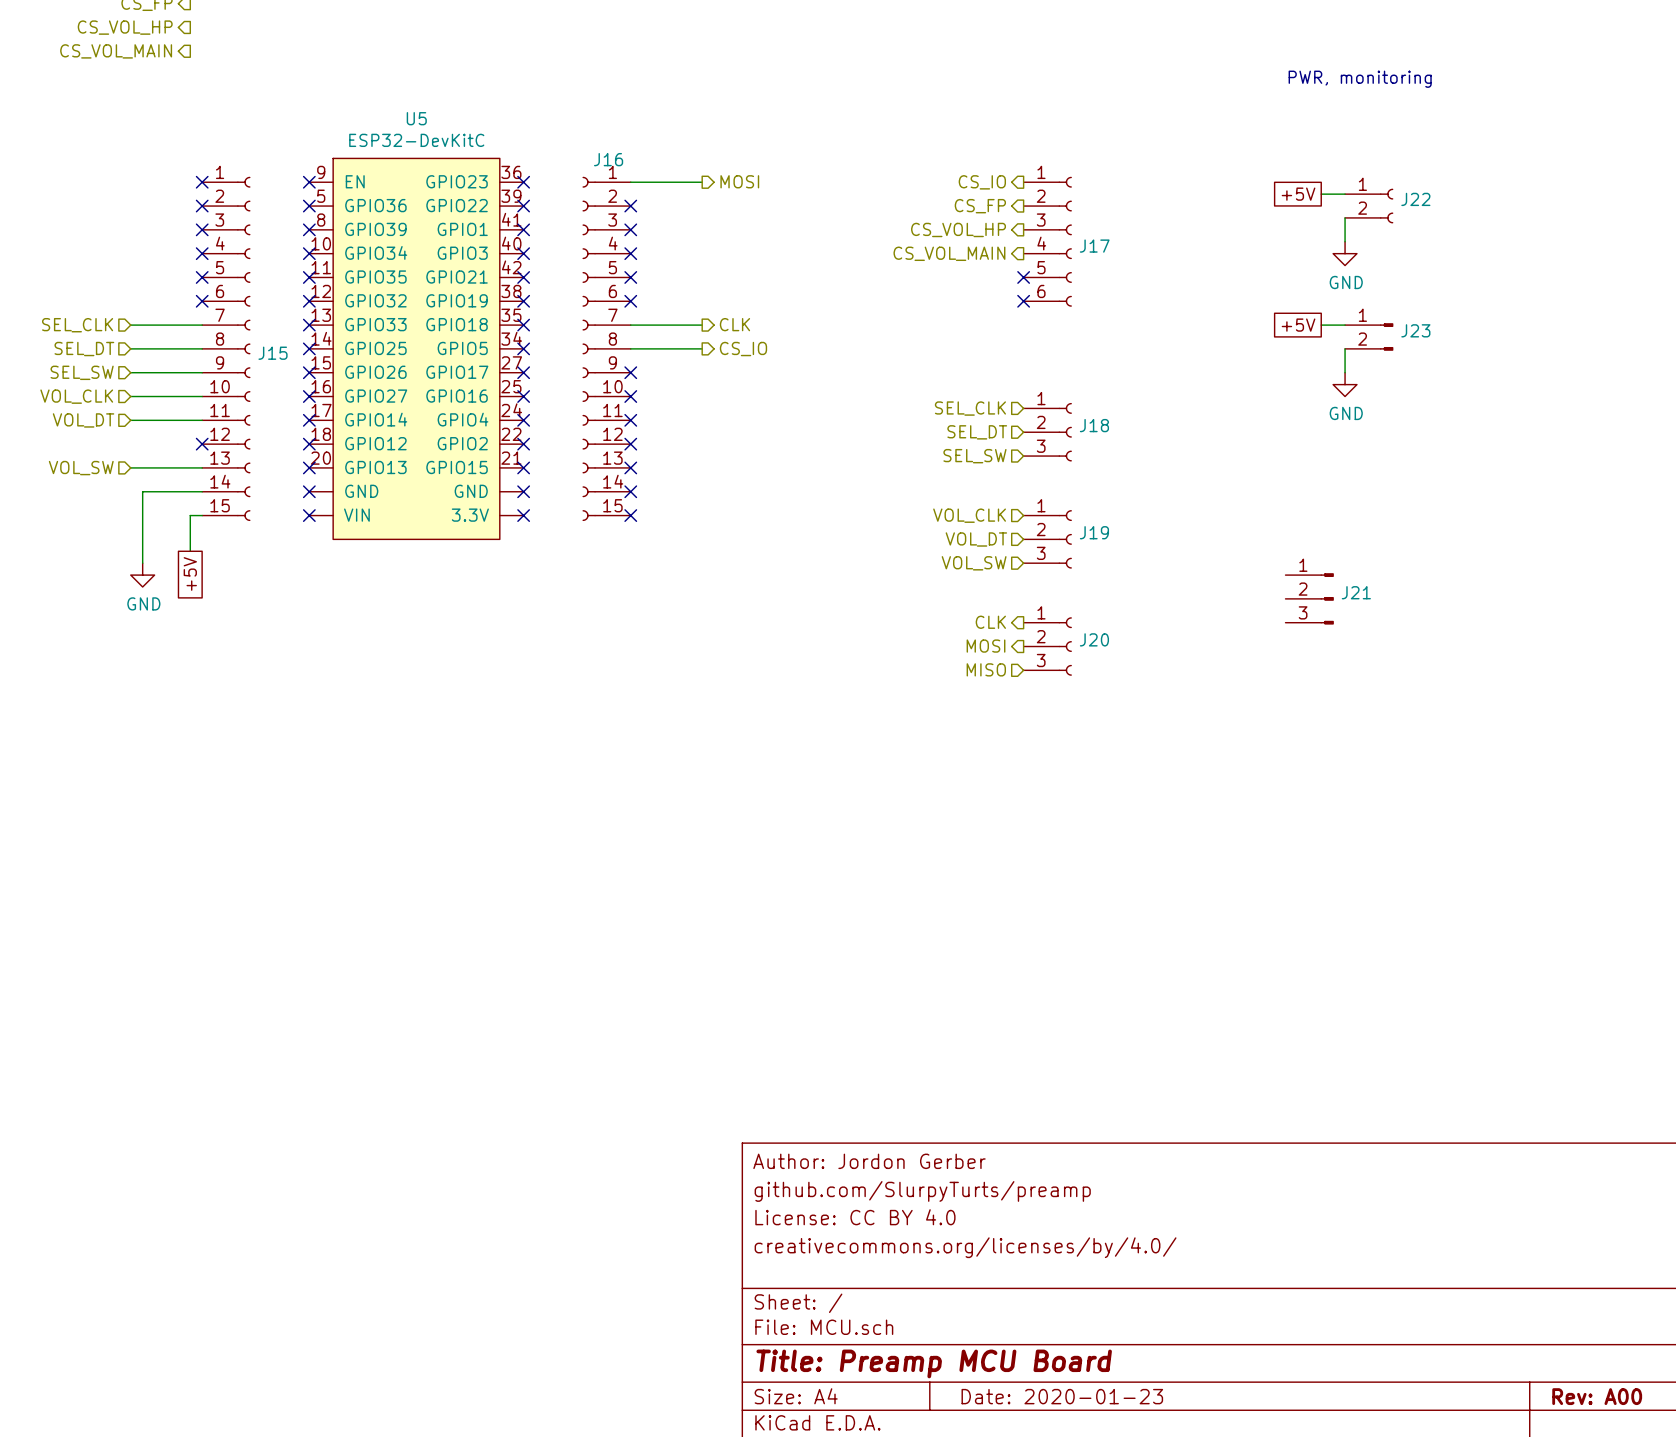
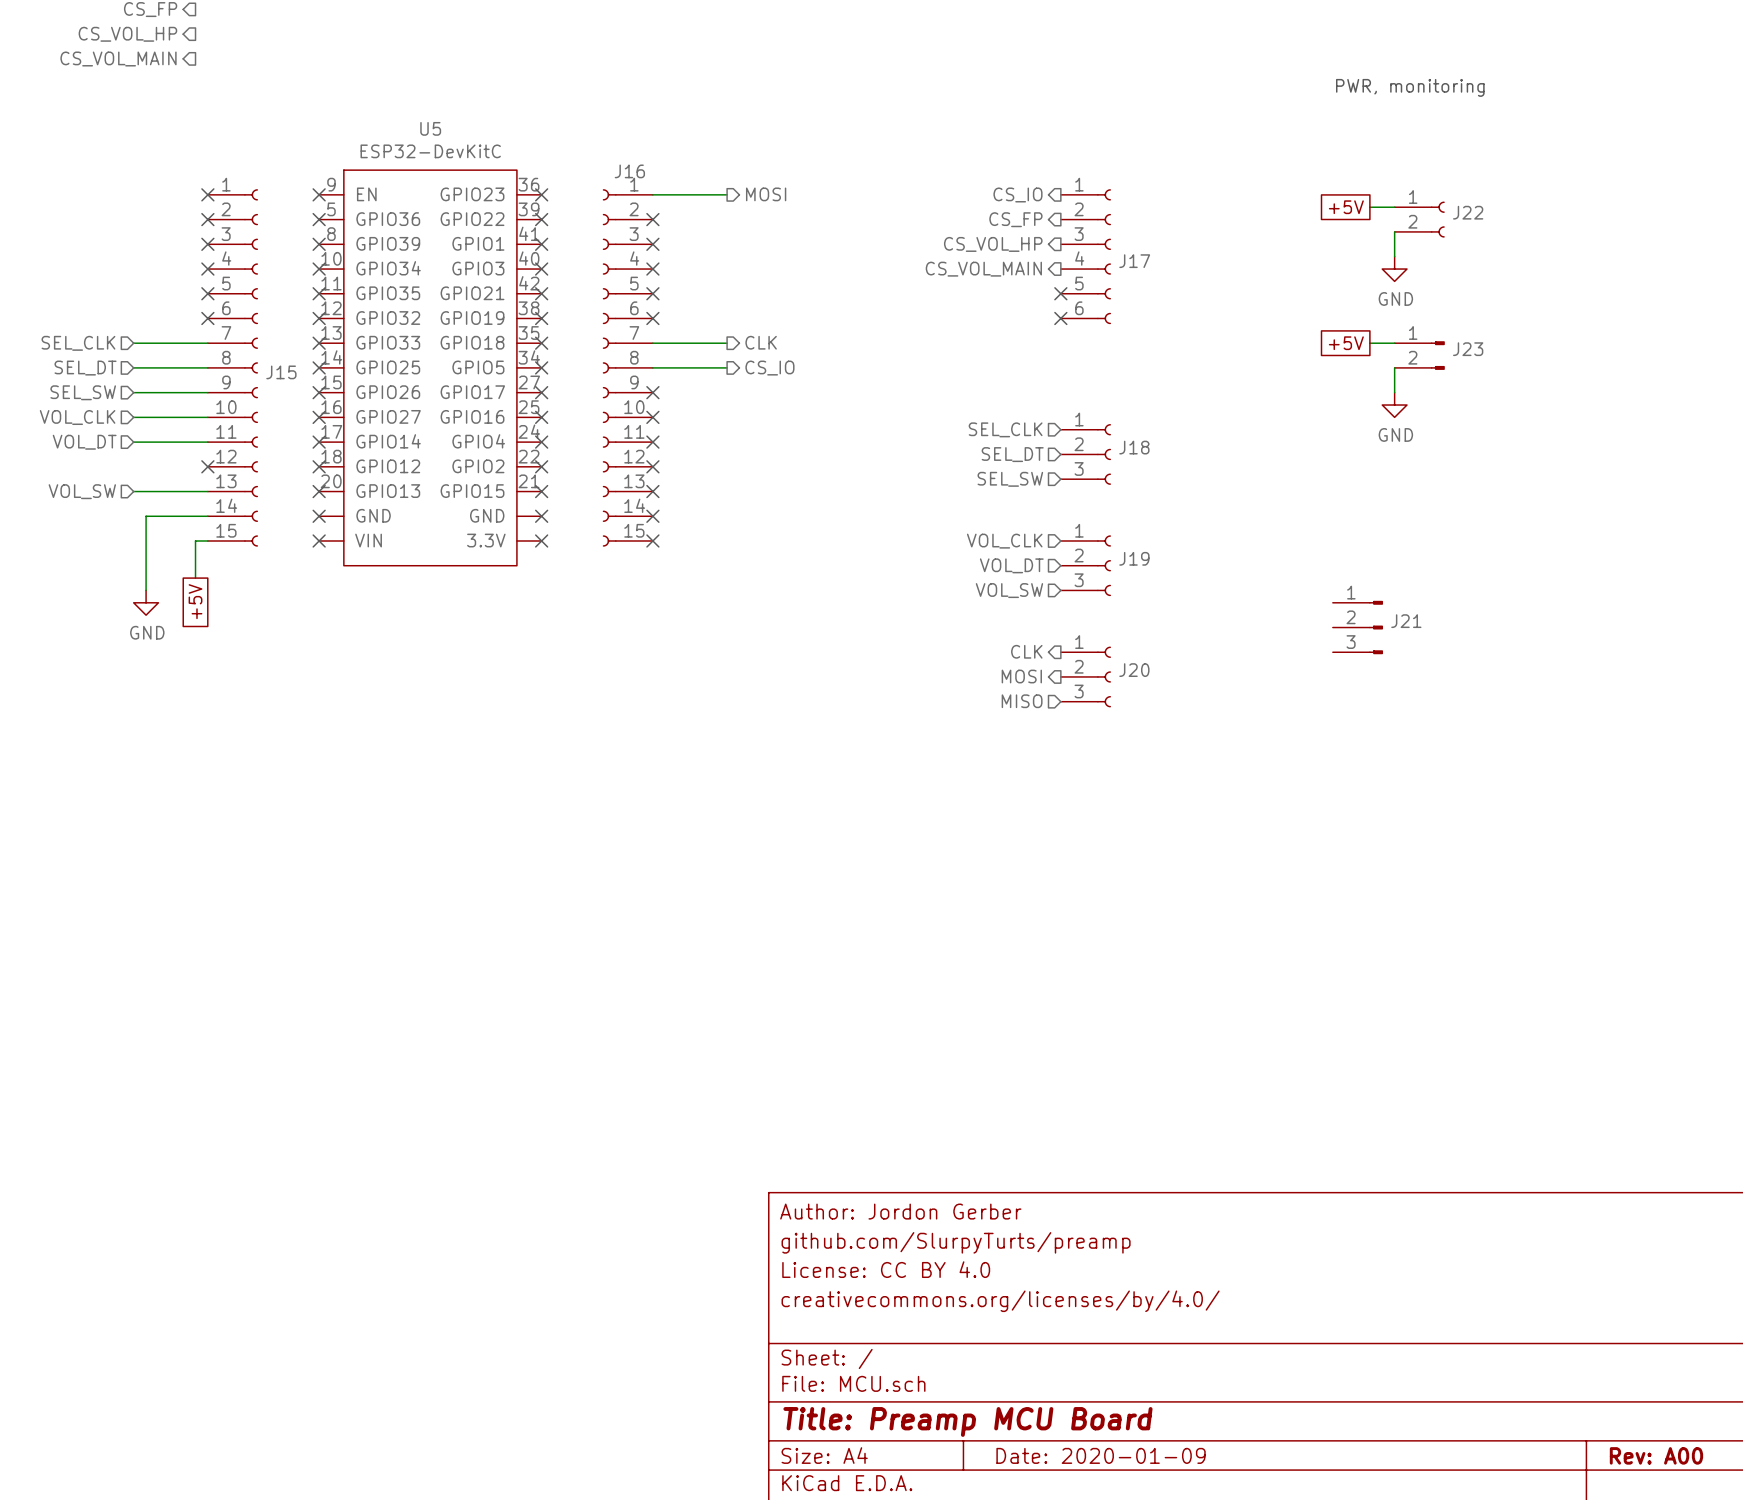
title block: Date: 2020-01-23 (1062, 1396) -> Date: 2020-01-09 (1101, 1455)

